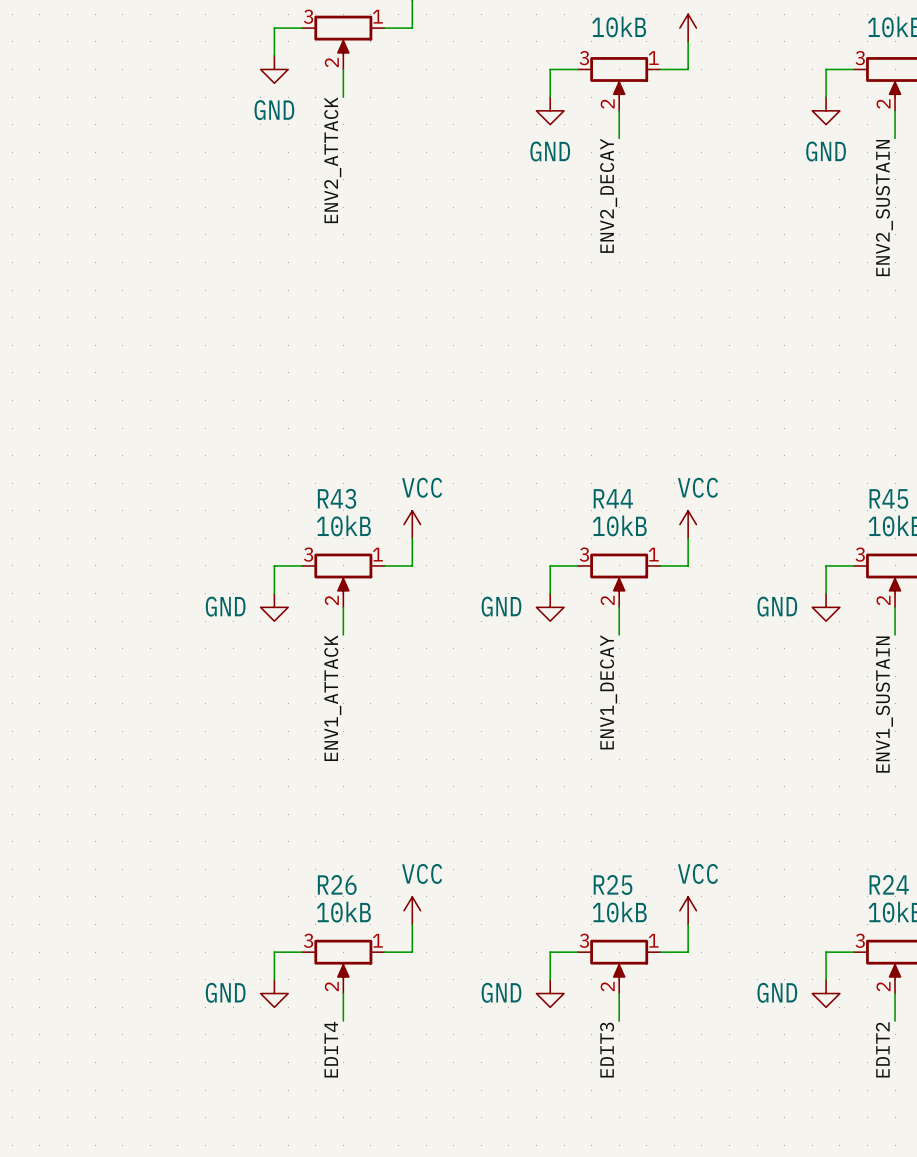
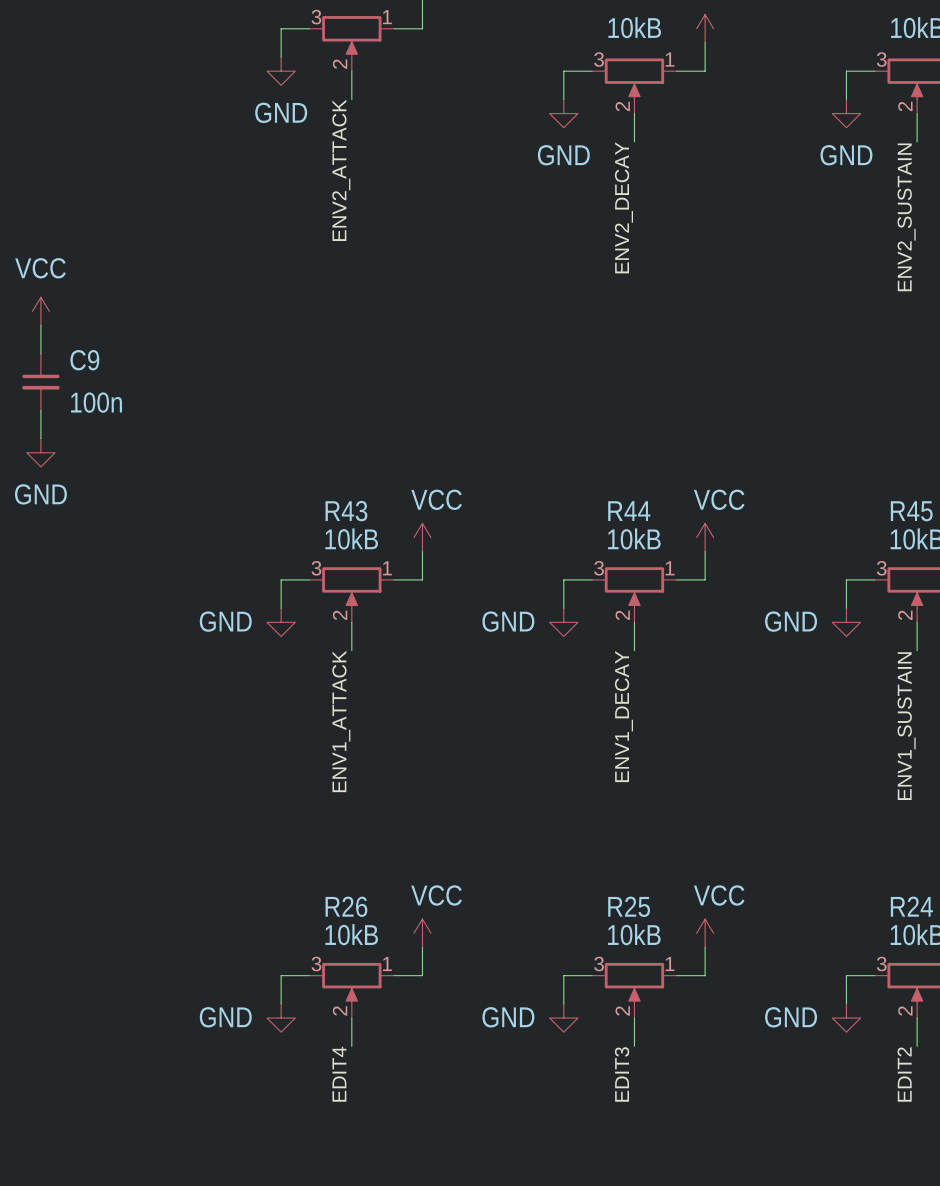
power symbol: none -> VCC (40, 311)
wire: none -> (40, 325) (40, 353)
C9: none -> 100n (40, 382)
wire: none -> (40, 410) (40, 438)
power symbol: none -> GND (40, 452)

